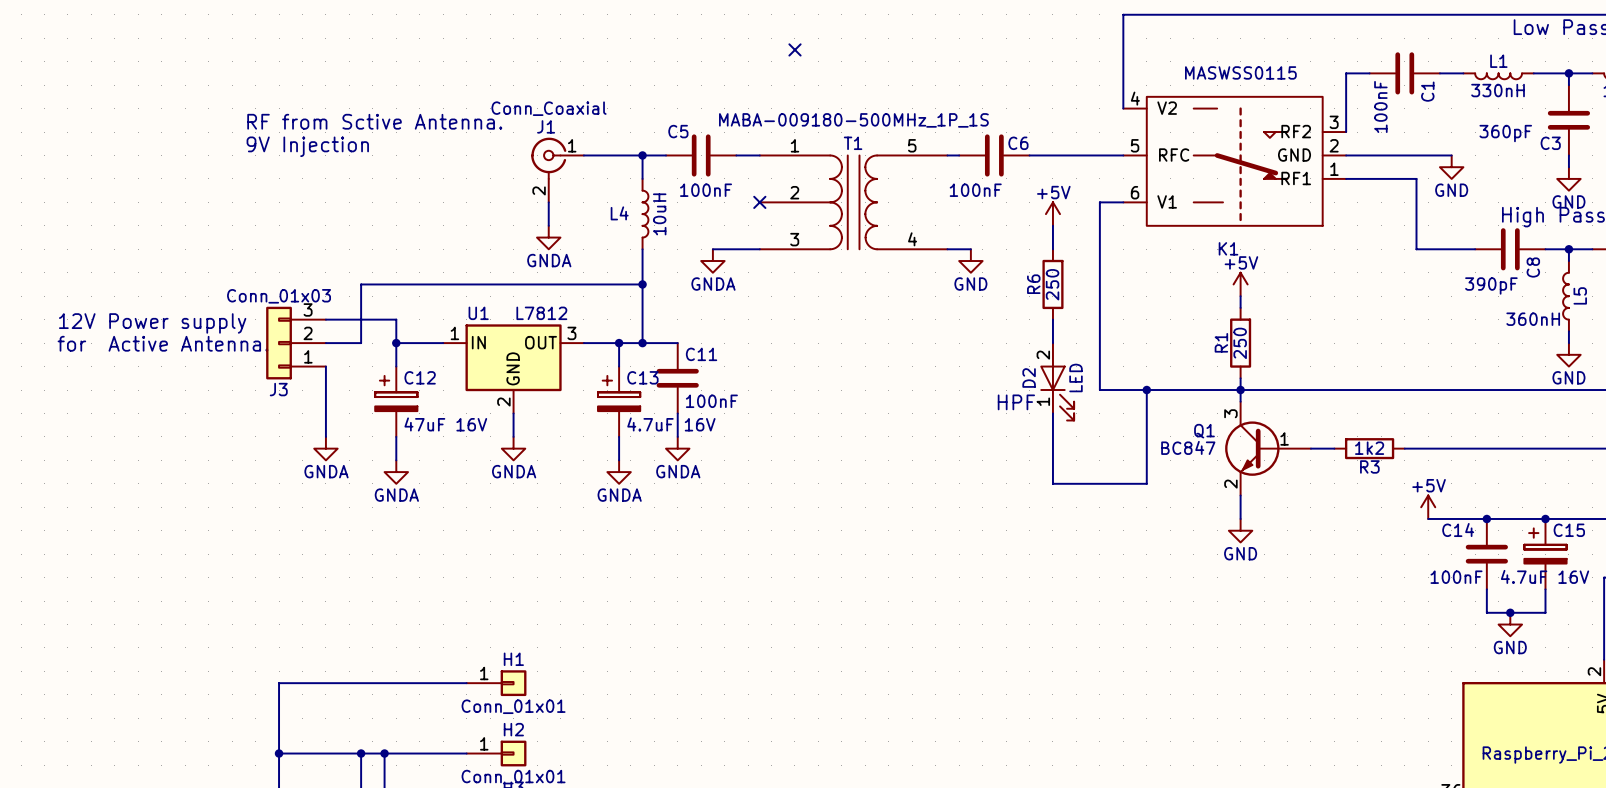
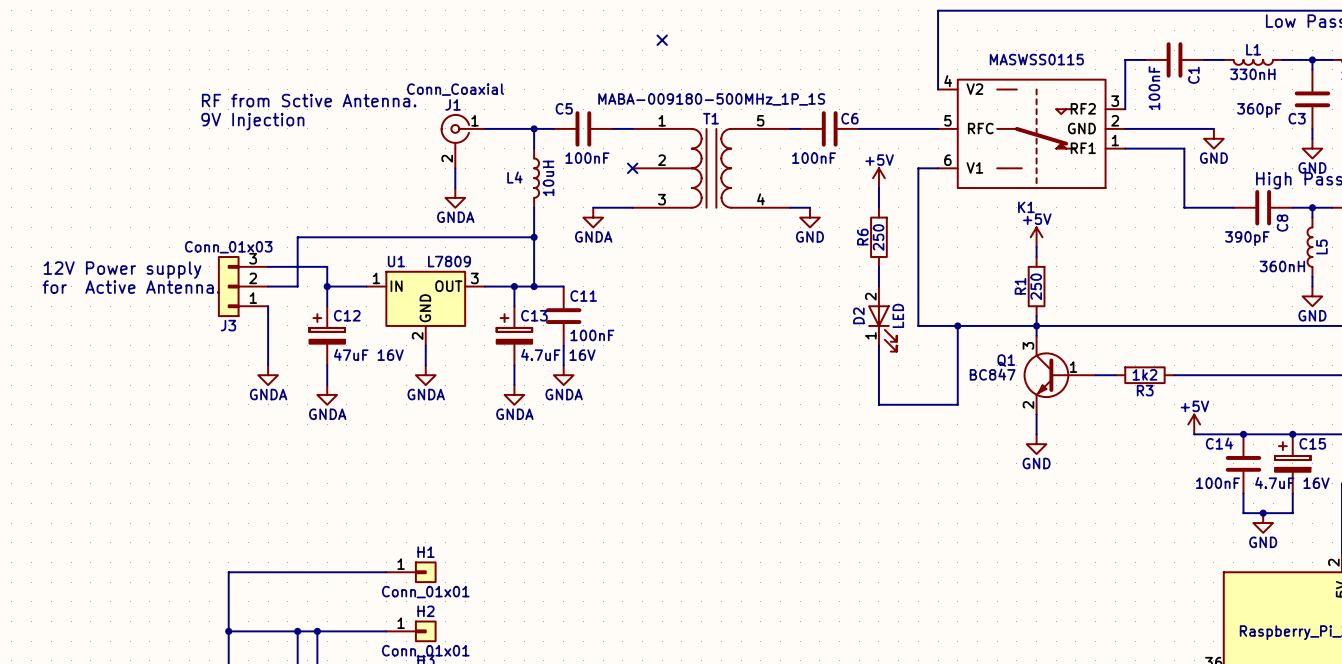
U1 value: L7812 (541, 313) -> L7809 (449, 261)
text: HPF (1016, 402) -> none

